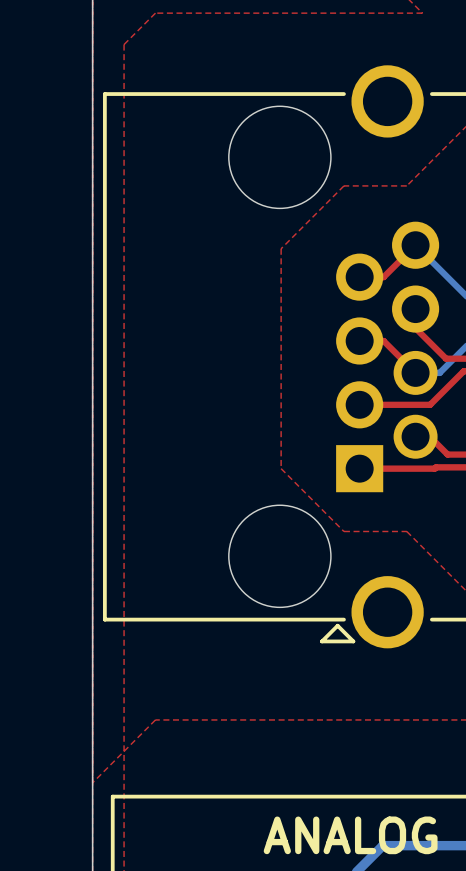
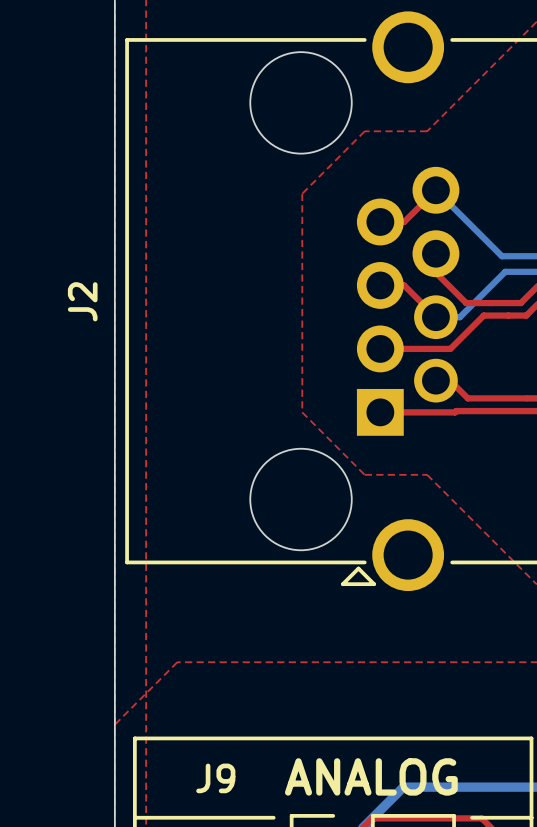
J2 name: none -> J2 (82, 301)
J9 name: none -> J9 (215, 778)

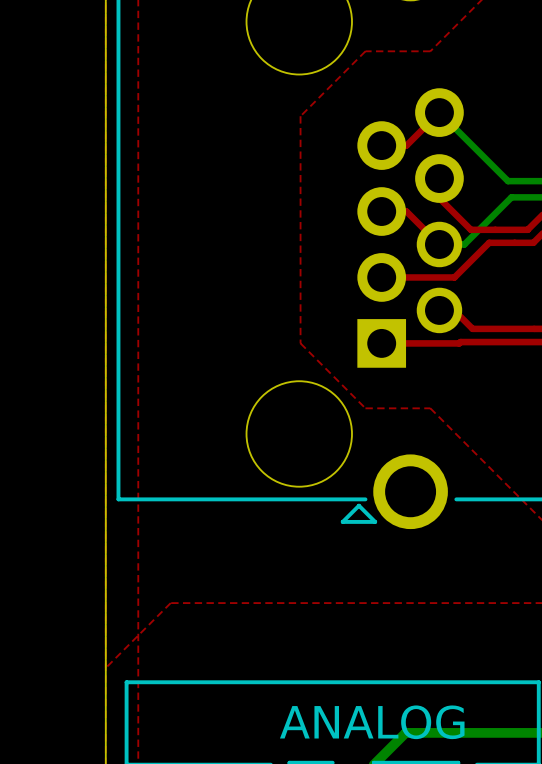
J2 name: J2 (82, 301) -> none
J9 name: J9 (215, 778) -> none

